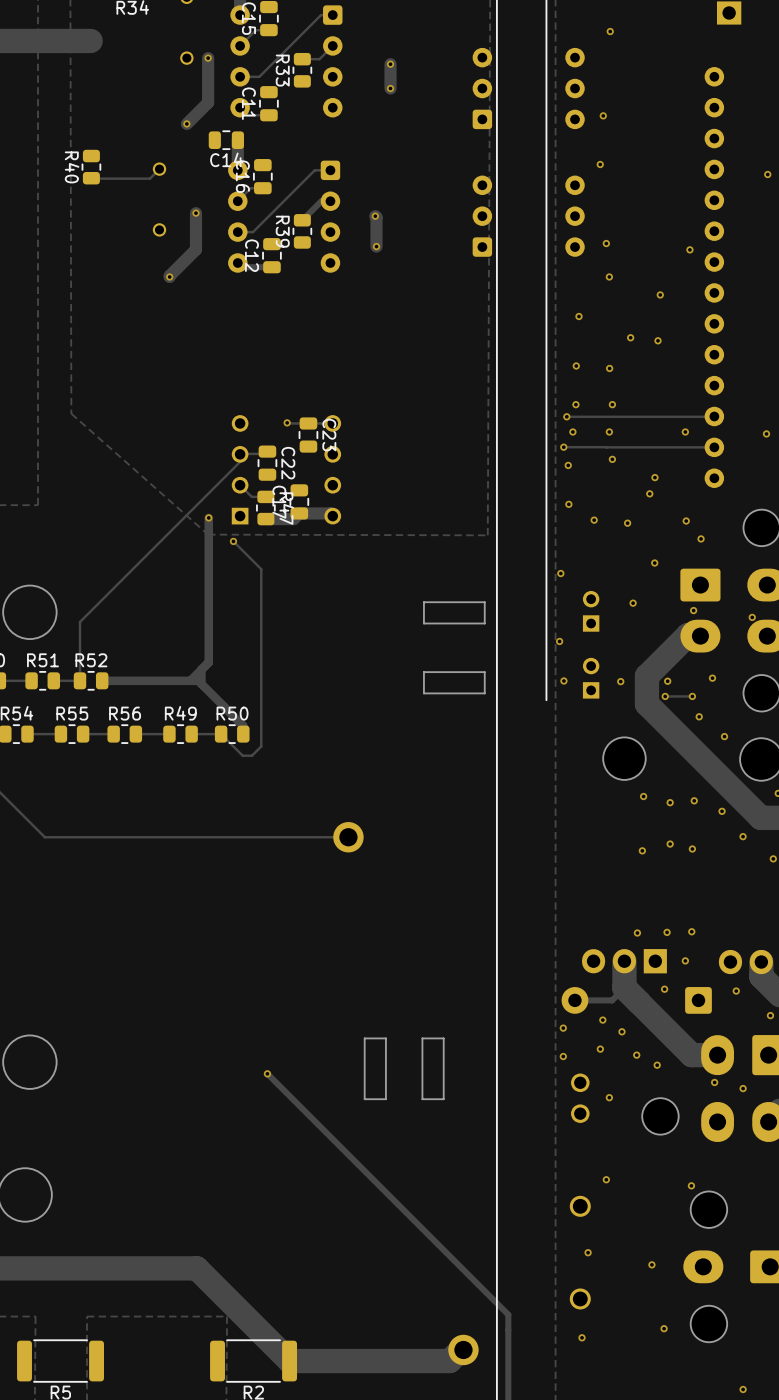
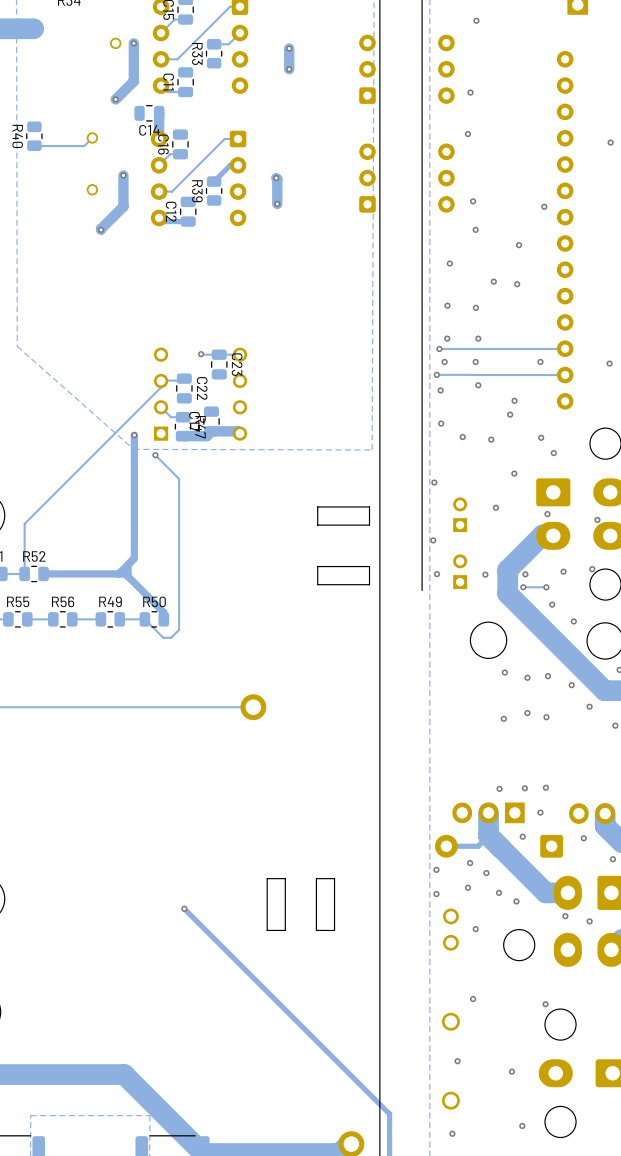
via: none -> (592, 569)

